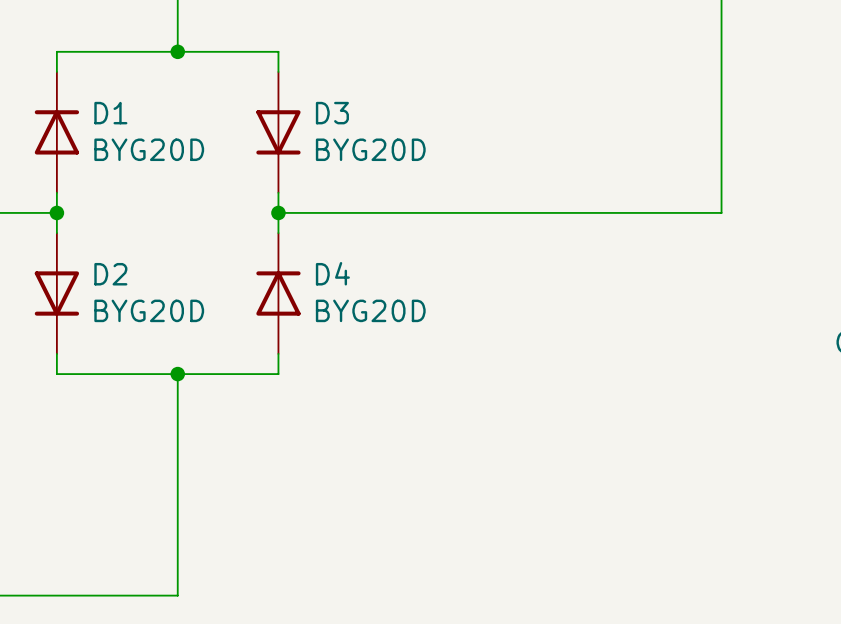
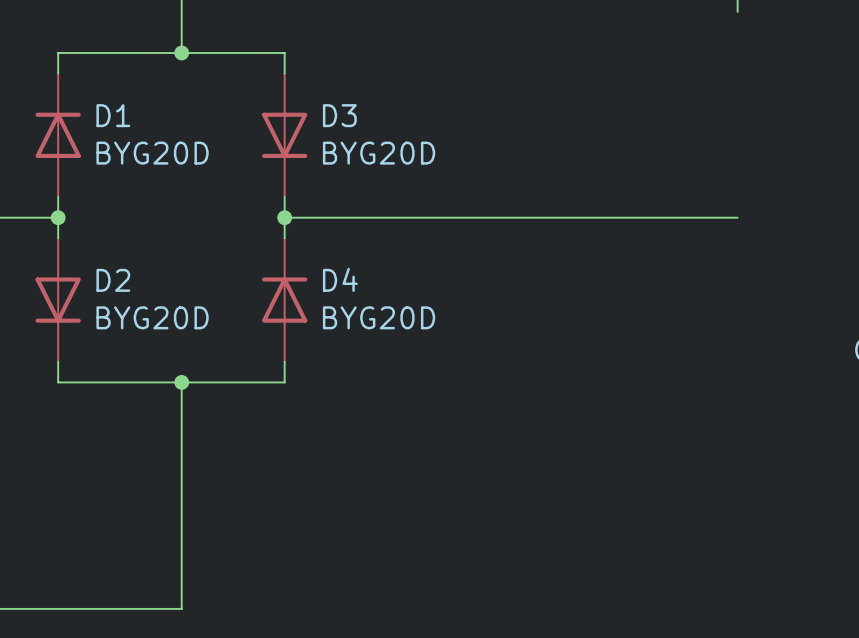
wire: (721, 11) (721, 212) -> none

